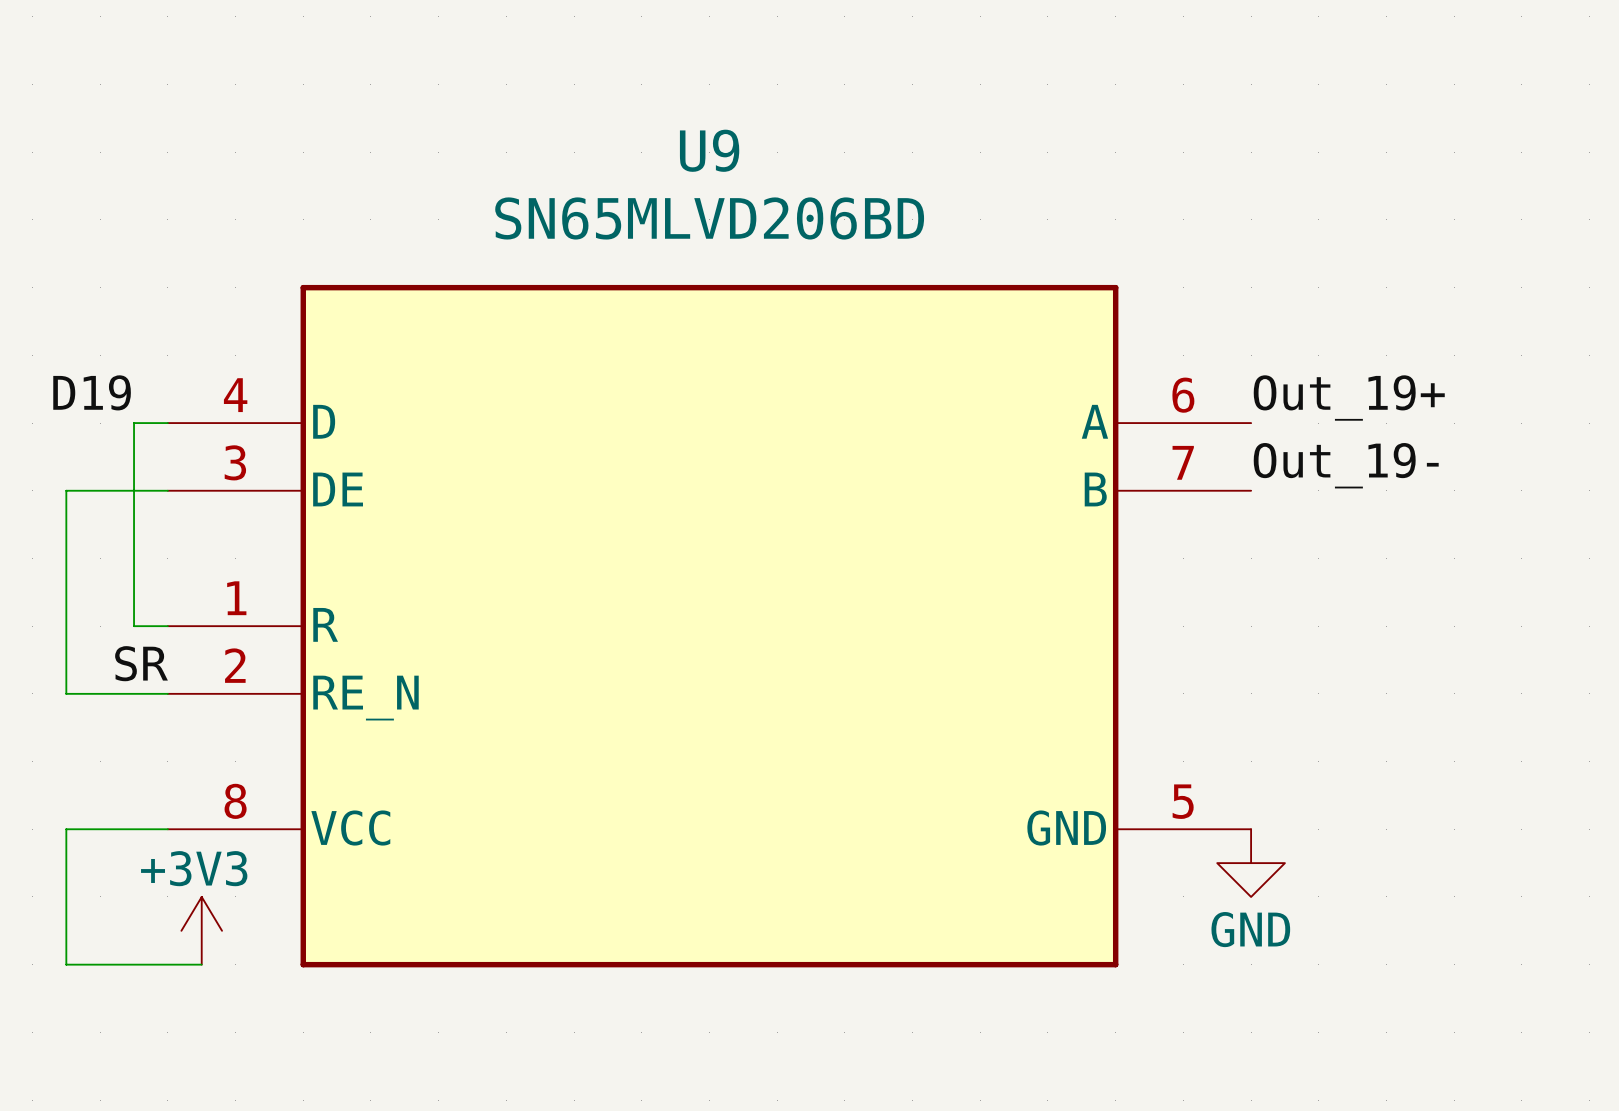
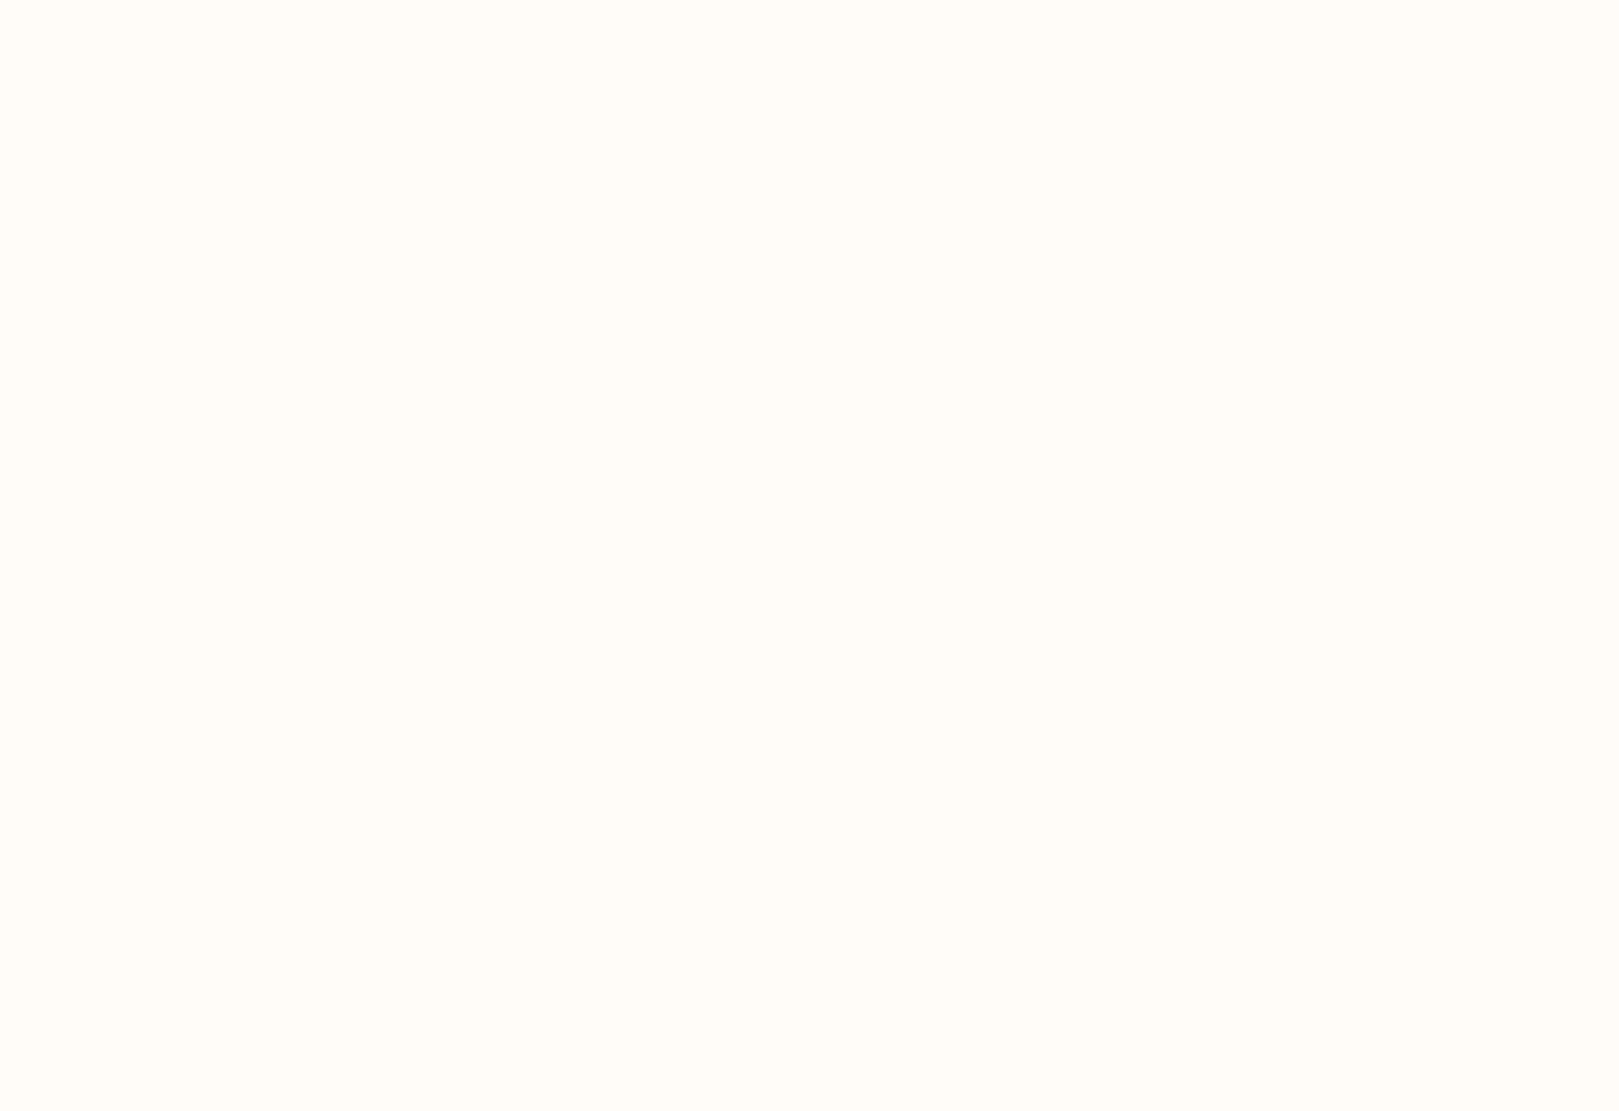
label: D19 (92, 392) -> none
label: Out_19+ (1349, 398) -> none
wire: (167, 423) (134, 423) (134, 626) (167, 626) -> none
label: Out_19- (1346, 465) -> none
wire: (167, 490) (66, 490) (66, 693) (167, 693) -> none
U9: SN65MLVD206BD (709, 626) -> none
label: SR (141, 663) -> none
wire: (167, 829) (66, 829) (66, 964) (201, 964) -> none
power symbol: GND (1251, 863) -> none
power symbol: +3V3 (201, 930) -> none

